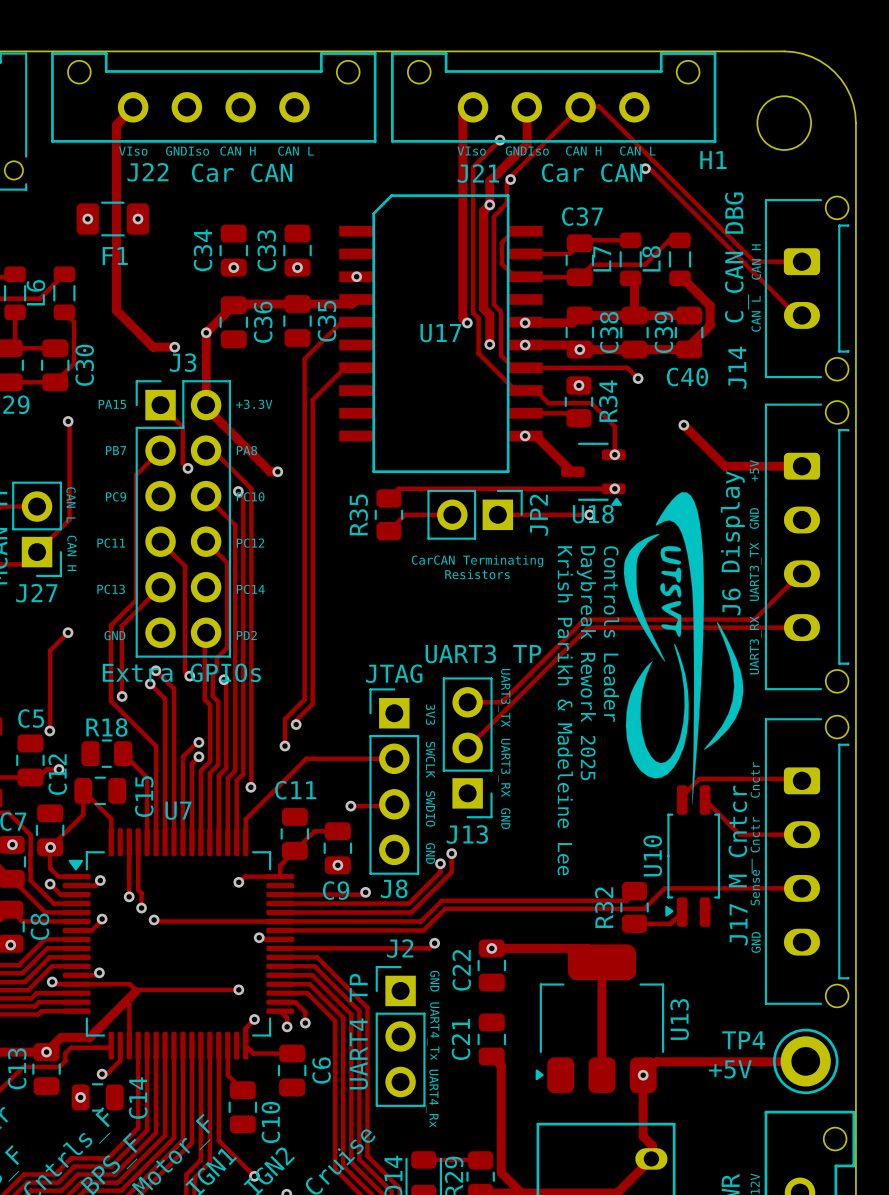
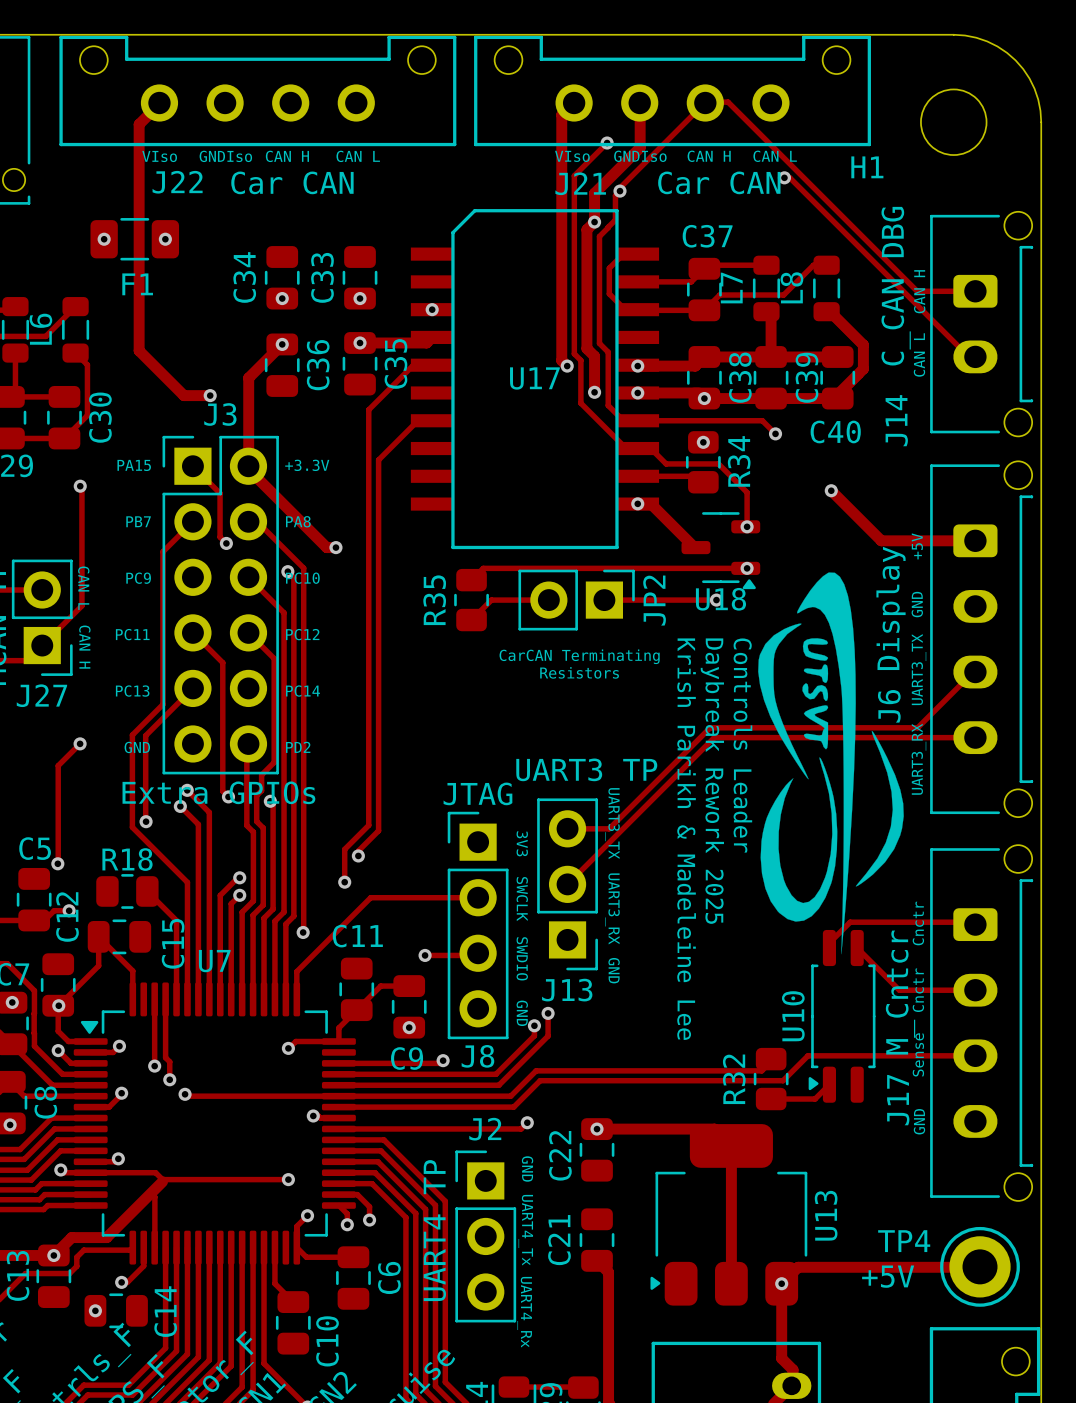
track: (234, 304) (297, 304) -> none
via: none -> (360, 342)
via position: (206, 332) -> (282, 344)

